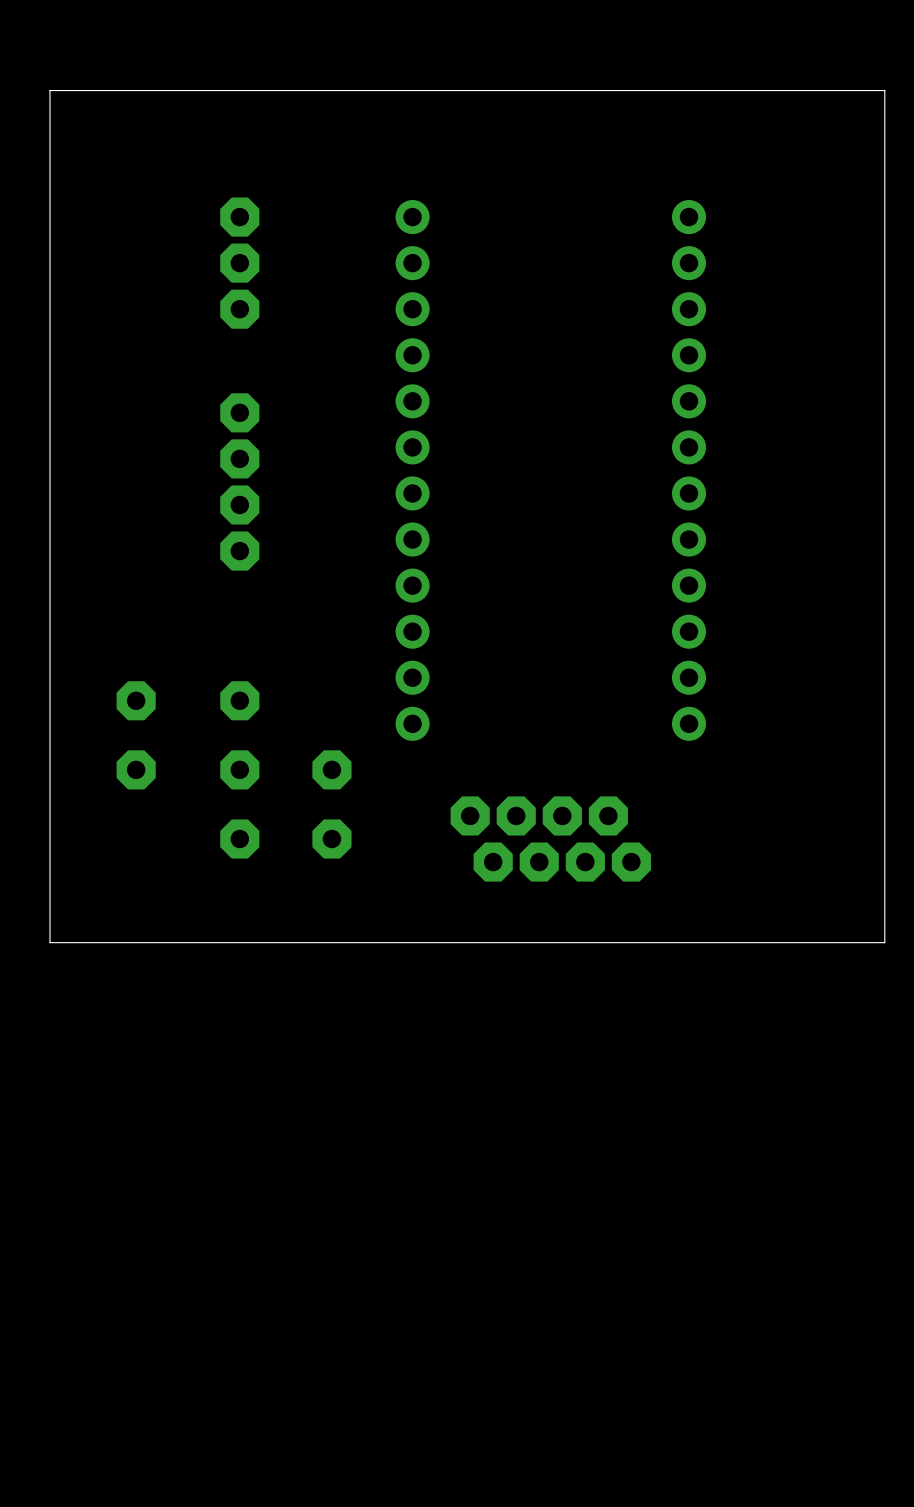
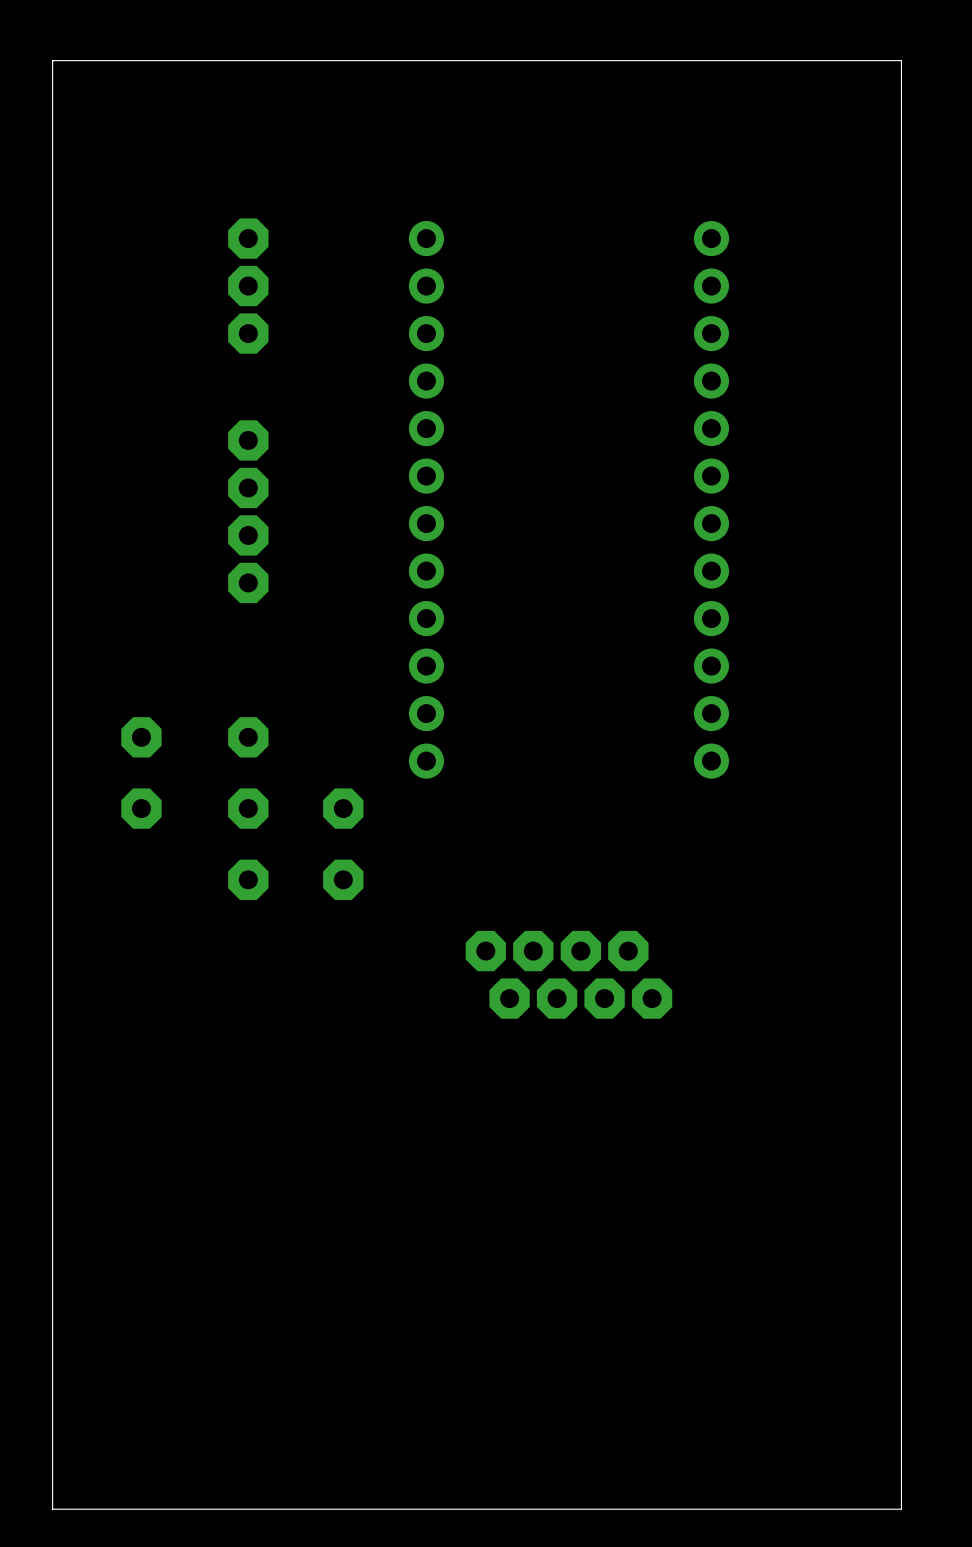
board edge: (50, 90) (884, 90) (884, 942) (50, 942) -> (52, 108) (52, 60) (901, 60) (901, 1509) (52, 1509) (52, 986)
part: (470, 815) -> none
part: (516, 815) -> none
part: (562, 815) -> none
part: (608, 815) -> none
part: (493, 862) -> none
part: (539, 862) -> none
part: (585, 862) -> none
part: (631, 862) -> none
part: none -> (485, 951)
part: none -> (533, 951)
part: none -> (580, 951)
part: none -> (628, 951)
part: none -> (509, 998)
part: none -> (557, 998)
part: none -> (604, 998)
part: none -> (652, 998)

